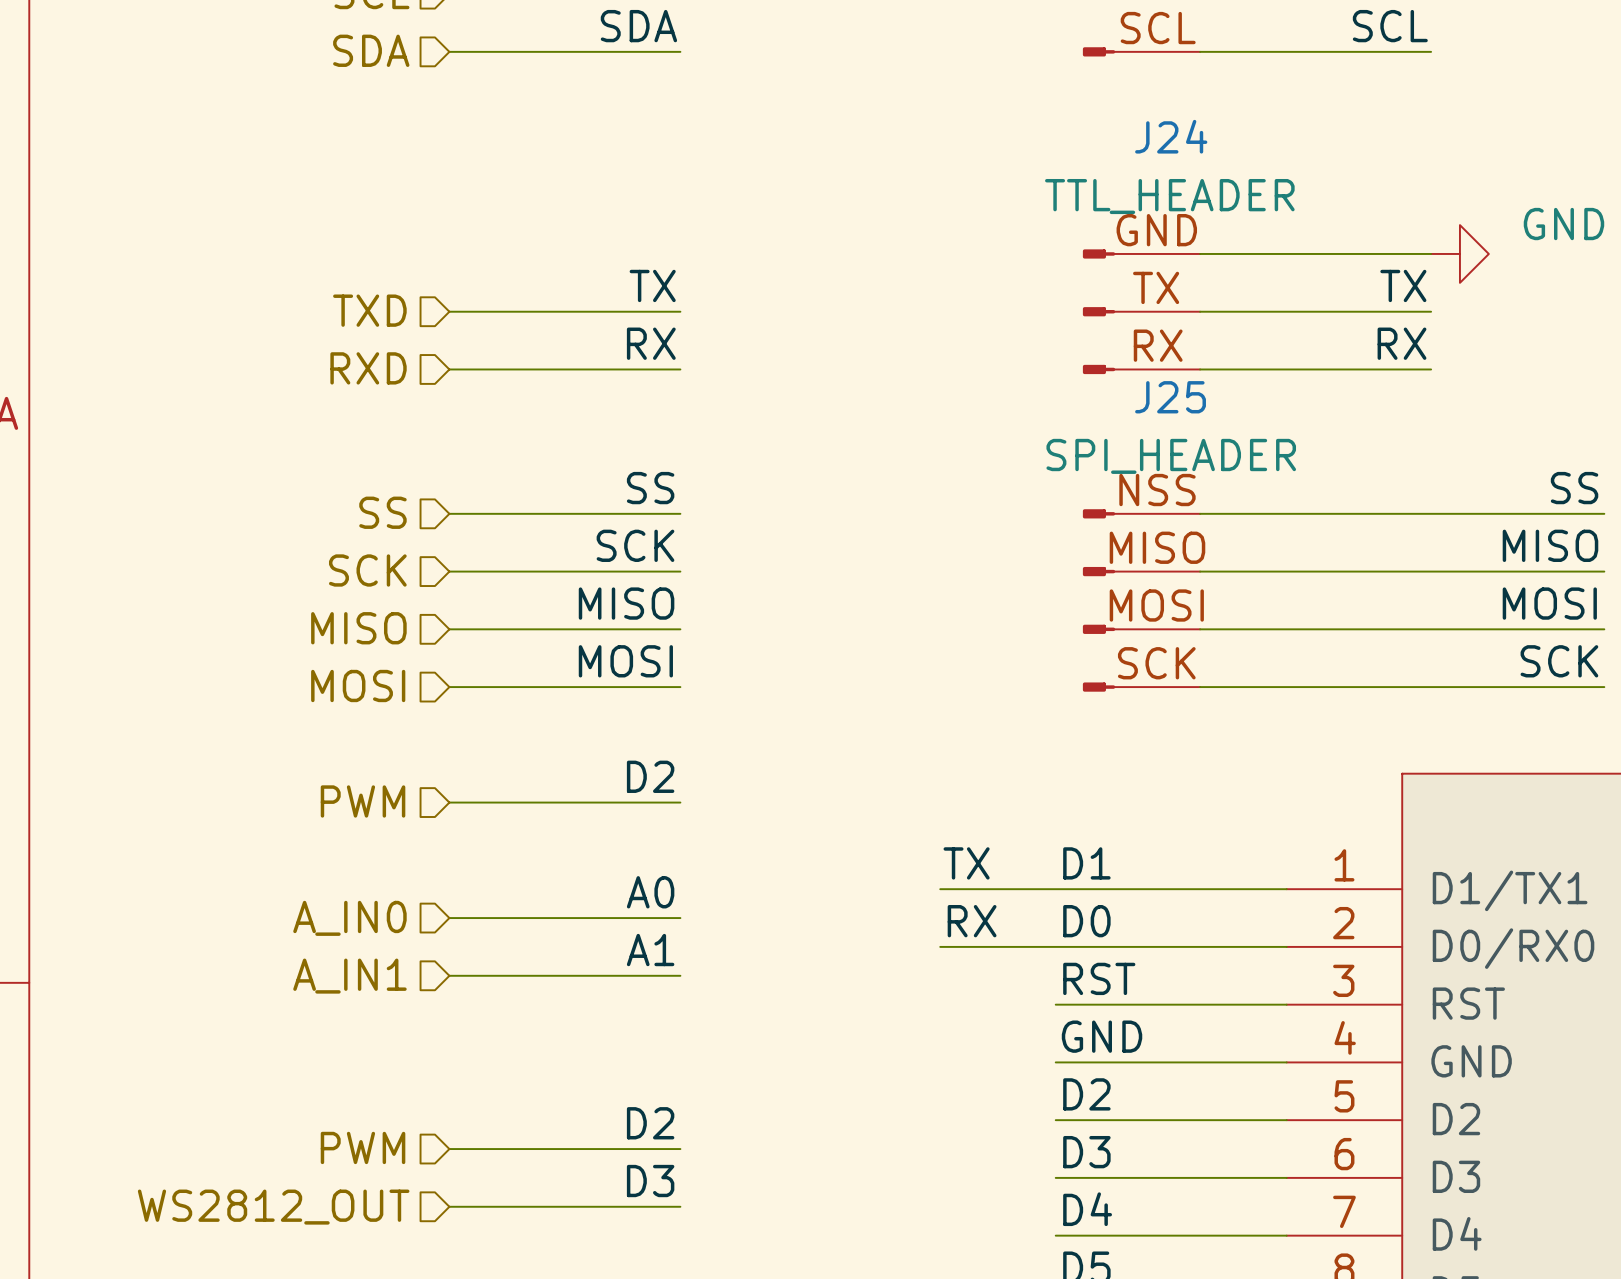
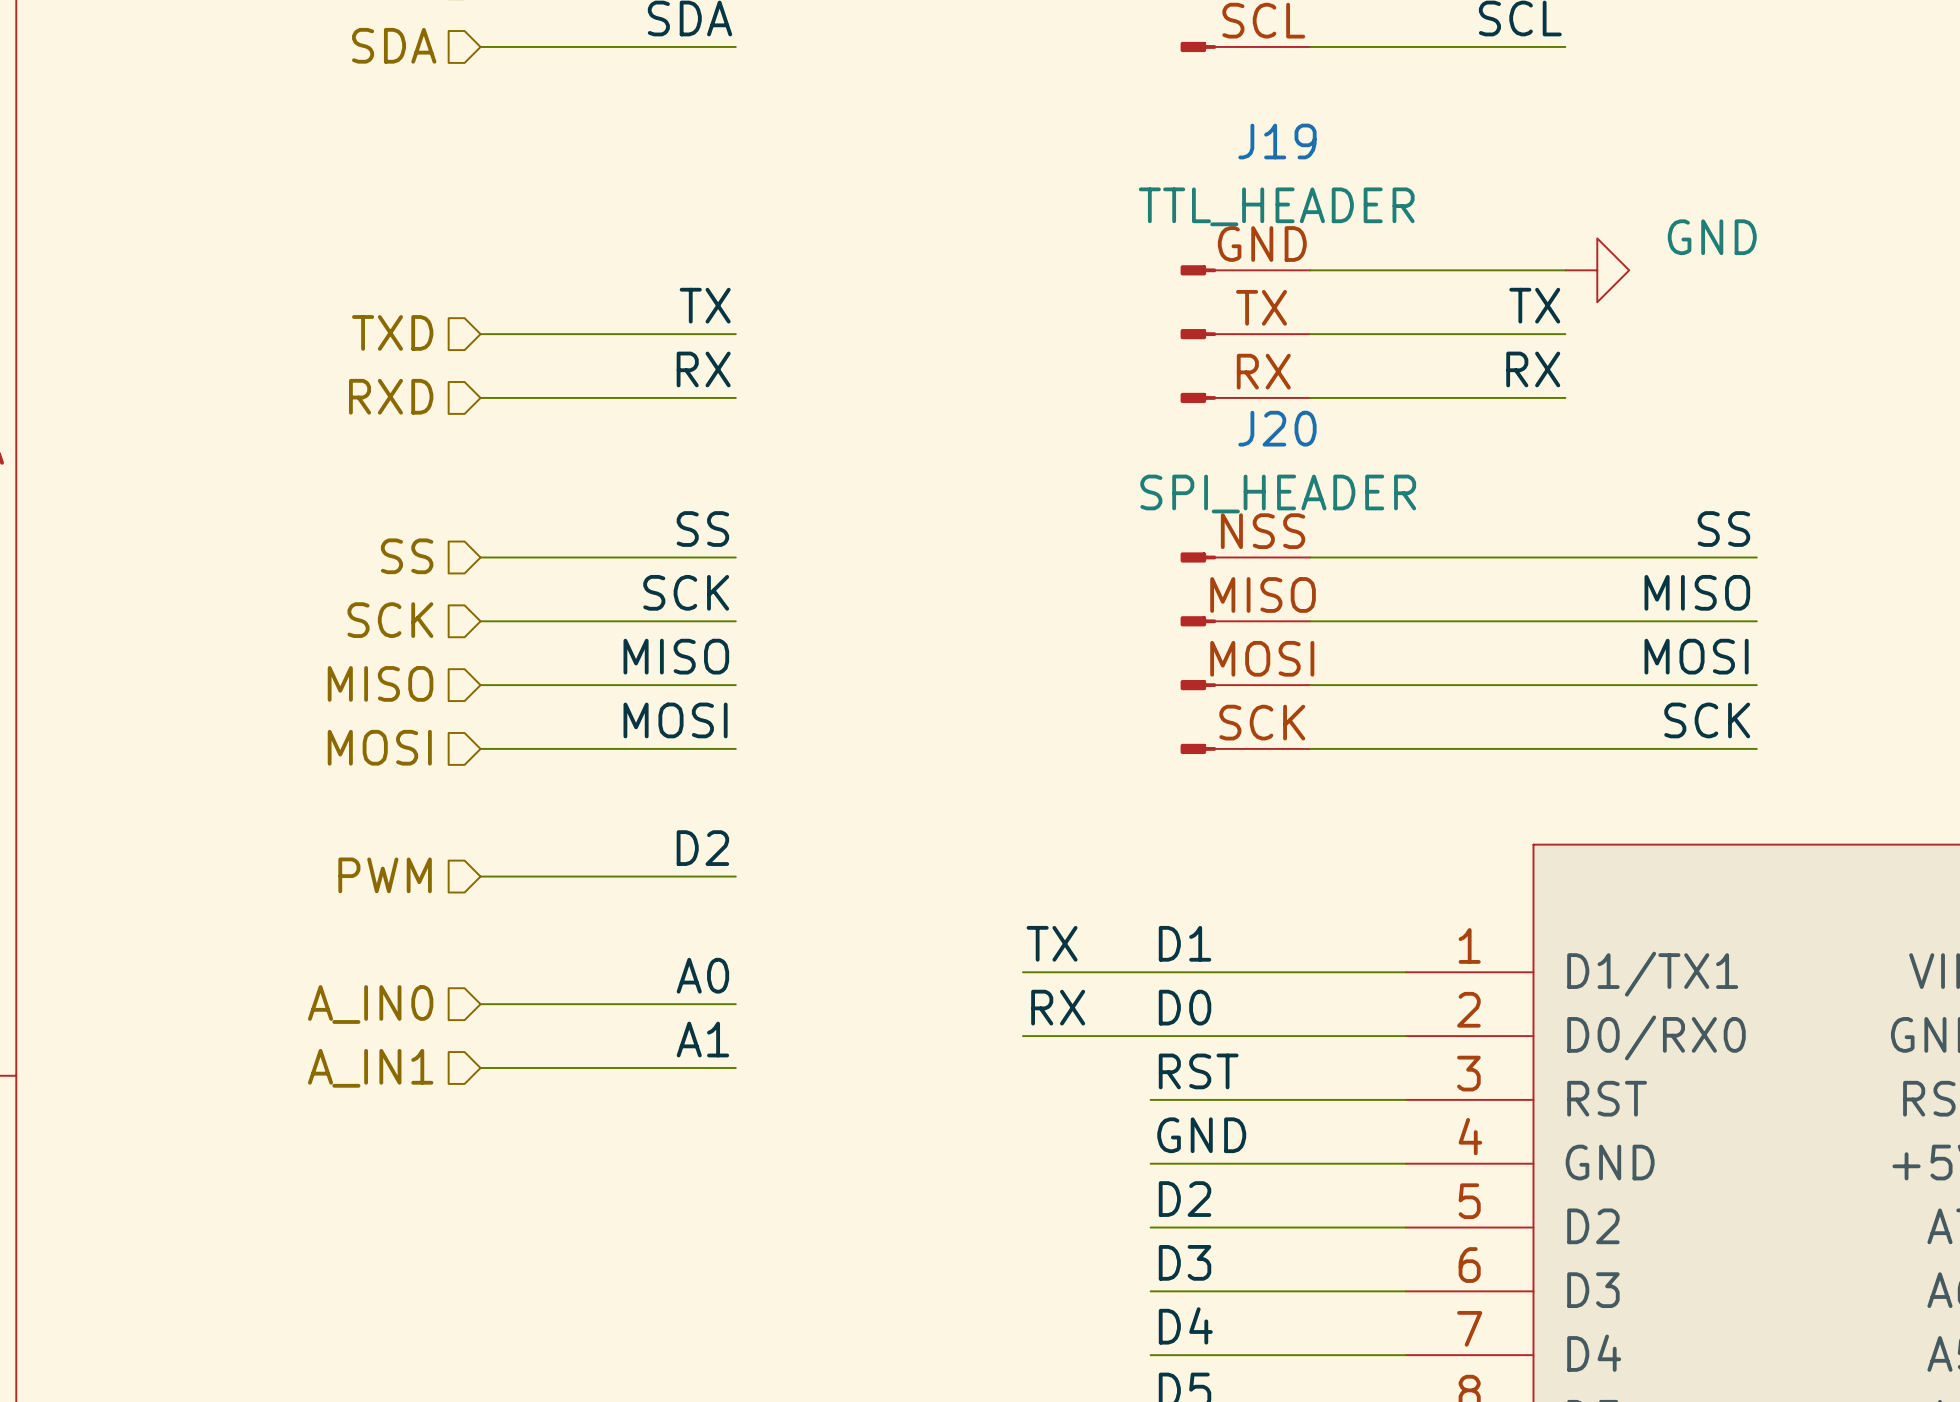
J24 name: J24 (1171, 136) -> J19 (1277, 141)
J25 name: J25 (1170, 397) -> J20 (1277, 428)
label: D2 (650, 1123) -> none
hierarchical label: PWM (363, 1147) -> none
wire: (449, 1149) (680, 1149) -> none
label: D3 (650, 1181) -> none
wire: (449, 1206) (680, 1206) -> none
hierarchical label: WS2812_OUT (273, 1207) -> none

